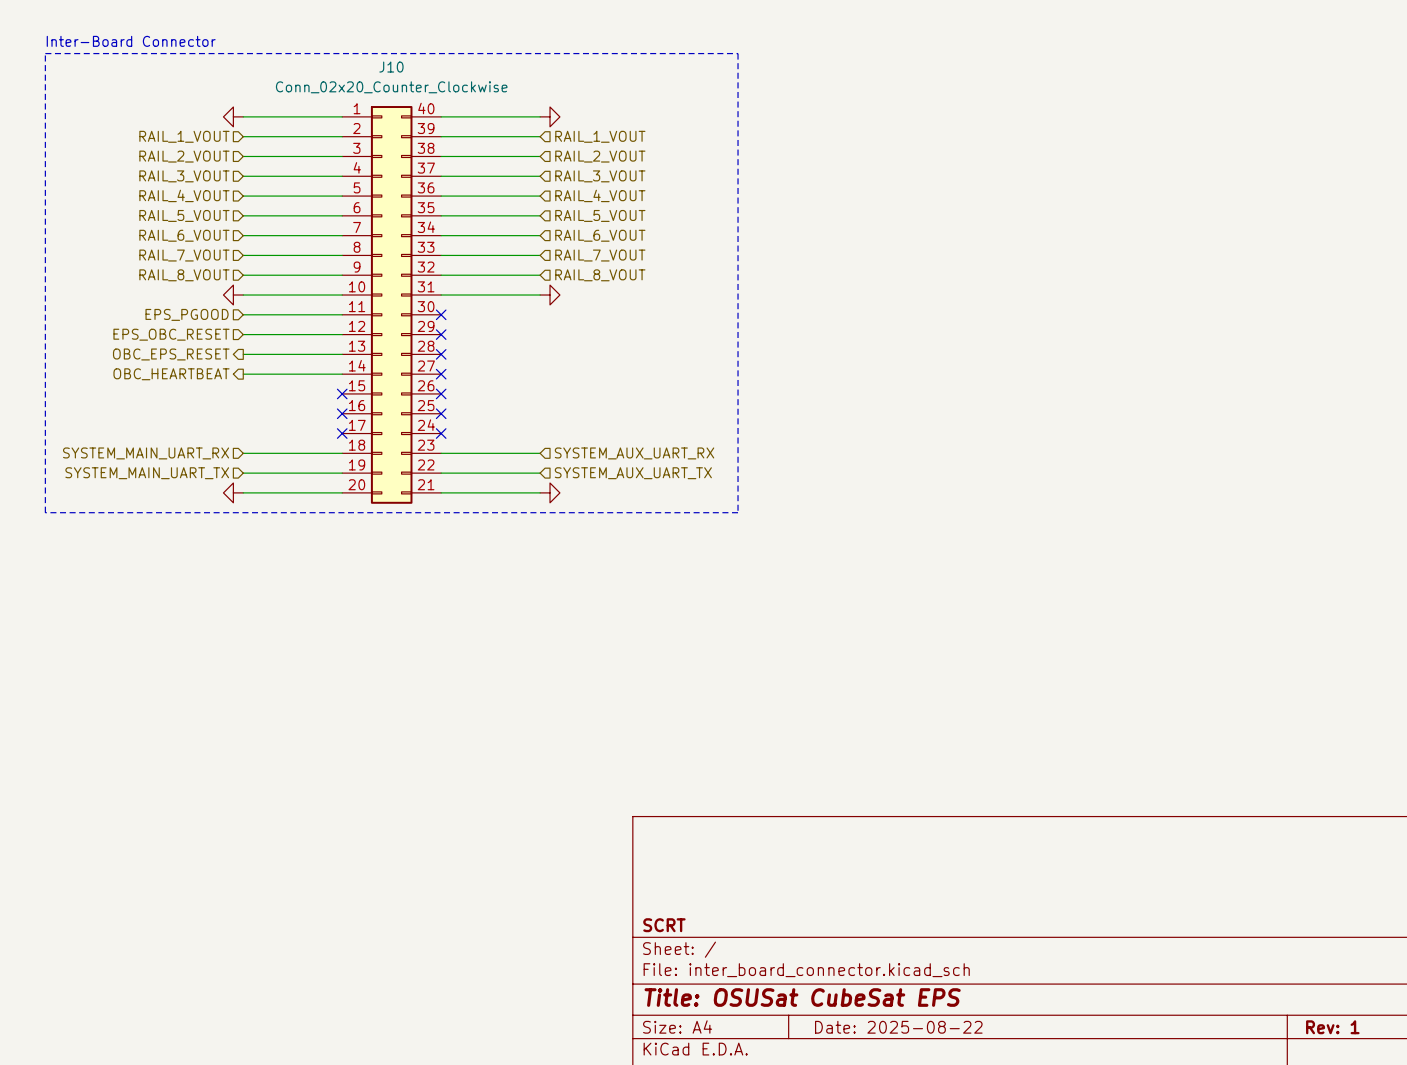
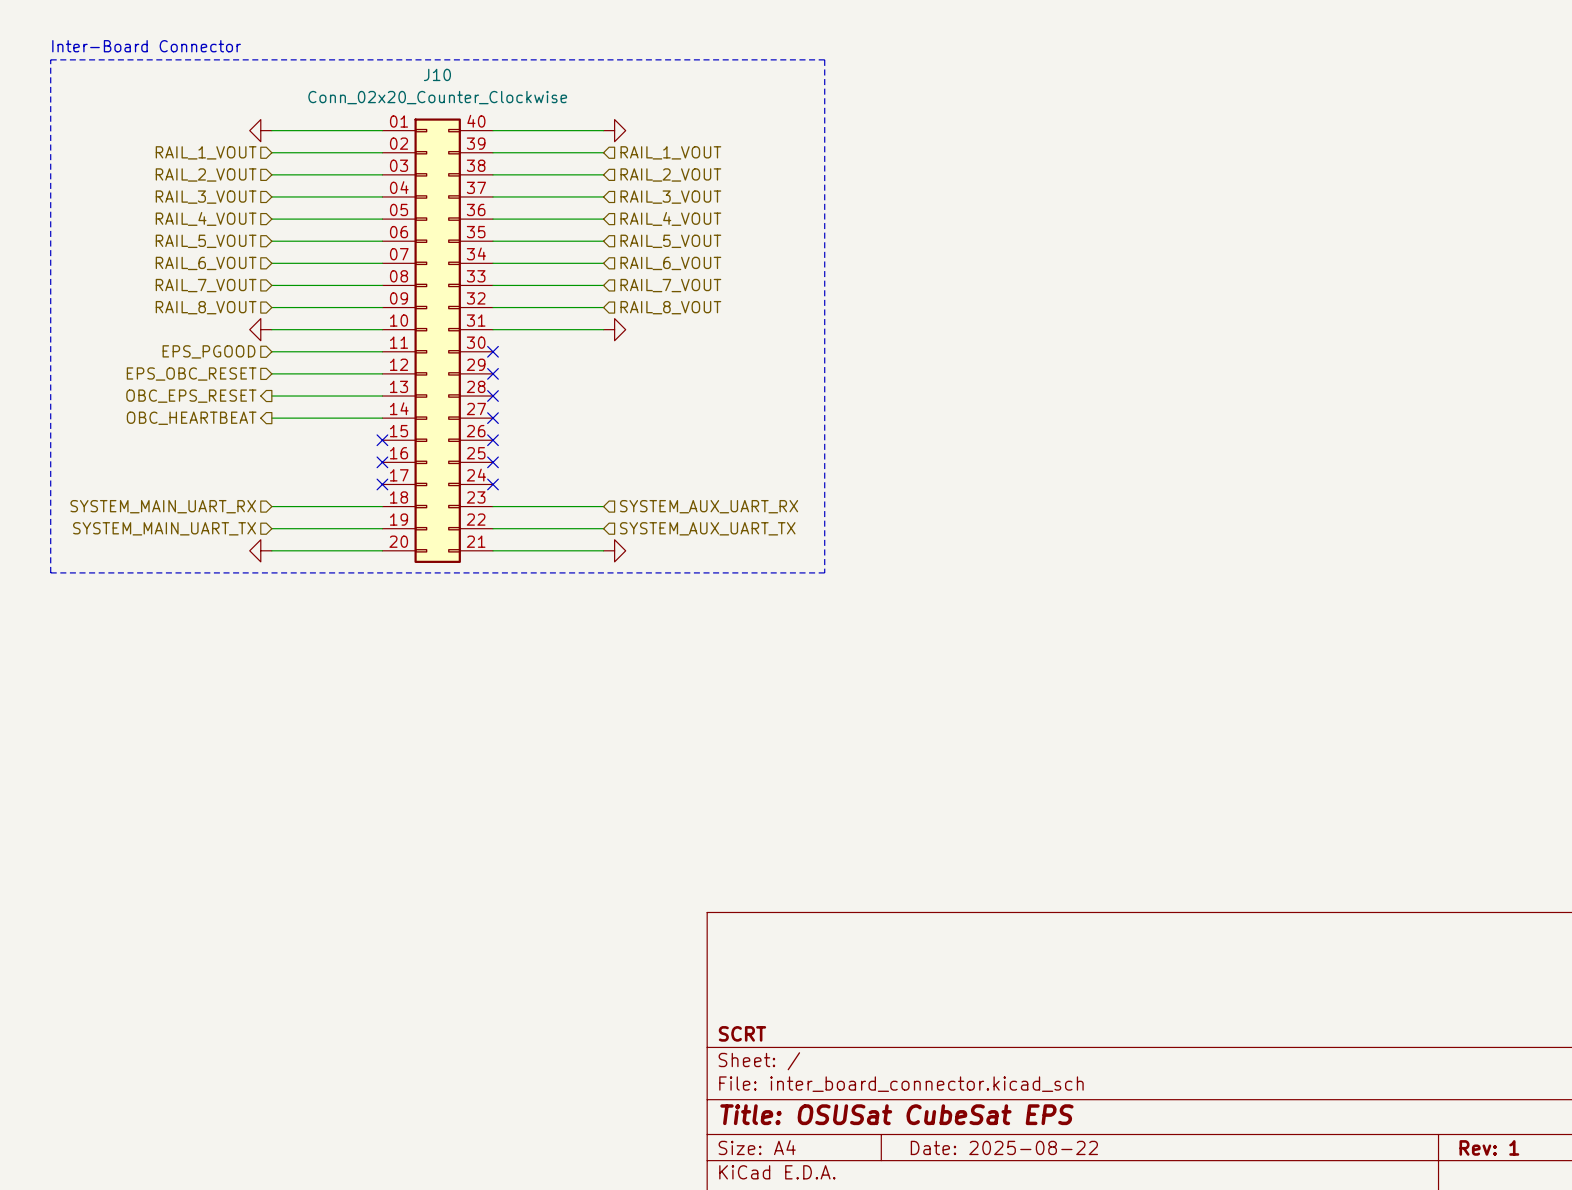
J10 symbol: [342, 106, 442, 504] -> [382, 118, 493, 563]

